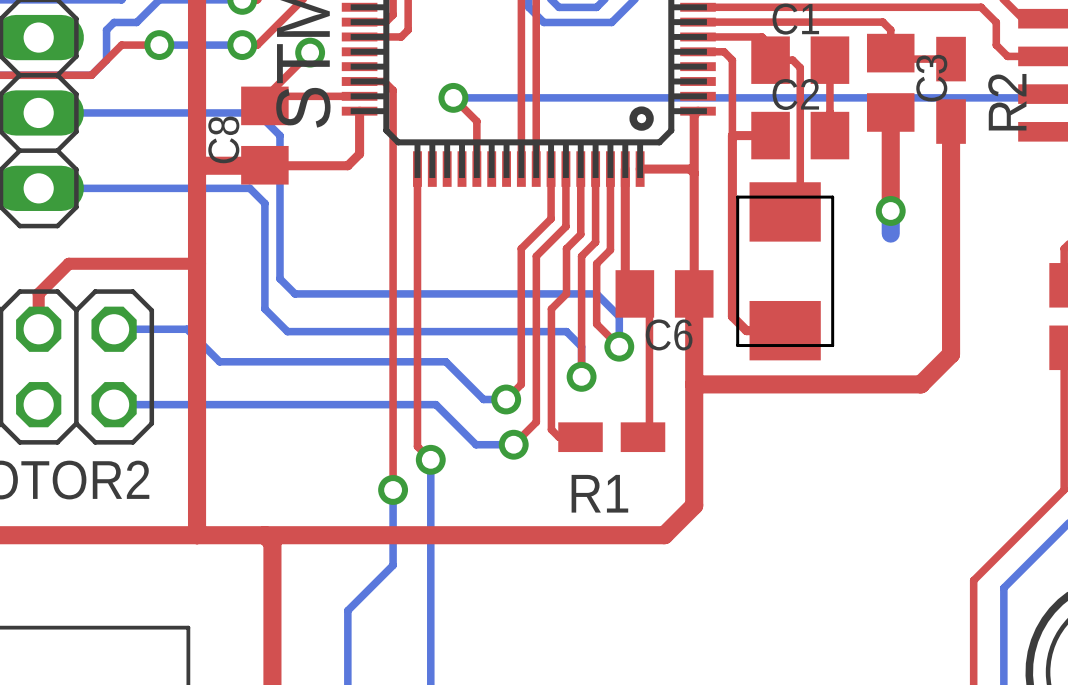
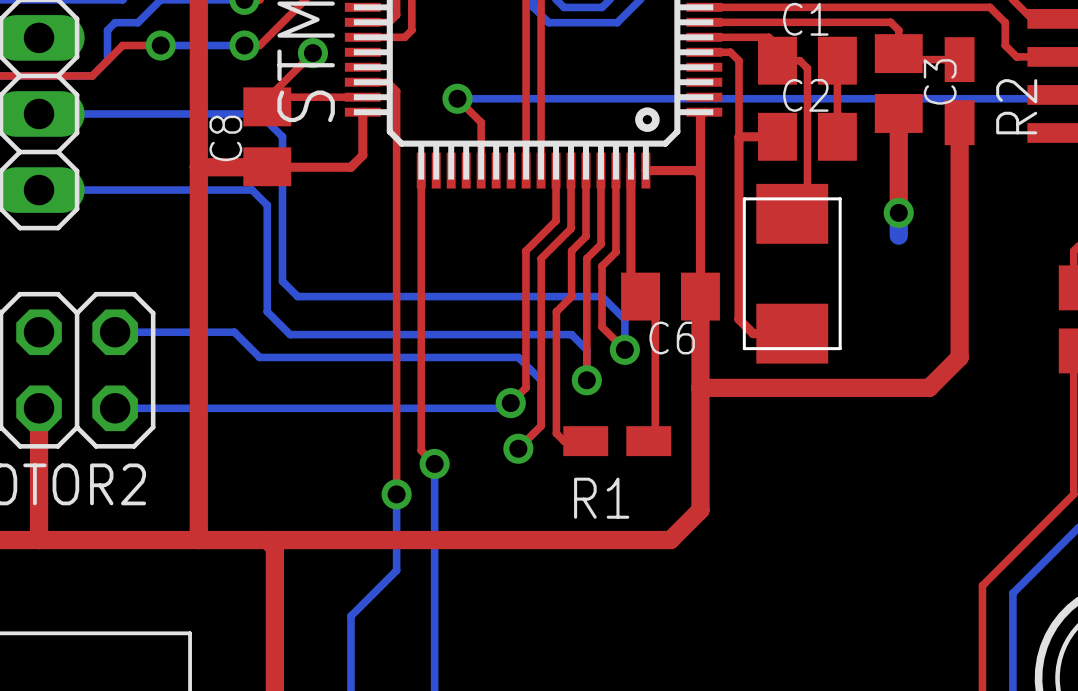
top track: (197, 263) (68, 263) (38, 293) (38, 329) -> none
bottom track: (187, 329) (219, 361) (445, 361) (483, 399) (506, 399) -> (188, 332) (234, 332) (259, 357) (518, 357) (541, 380) (541, 425) (518, 448)
top track: none -> (39, 408) (39, 540)
bottom track: (435, 404) (476, 444) (513, 444) -> (439, 408) (505, 408) (510, 403)

